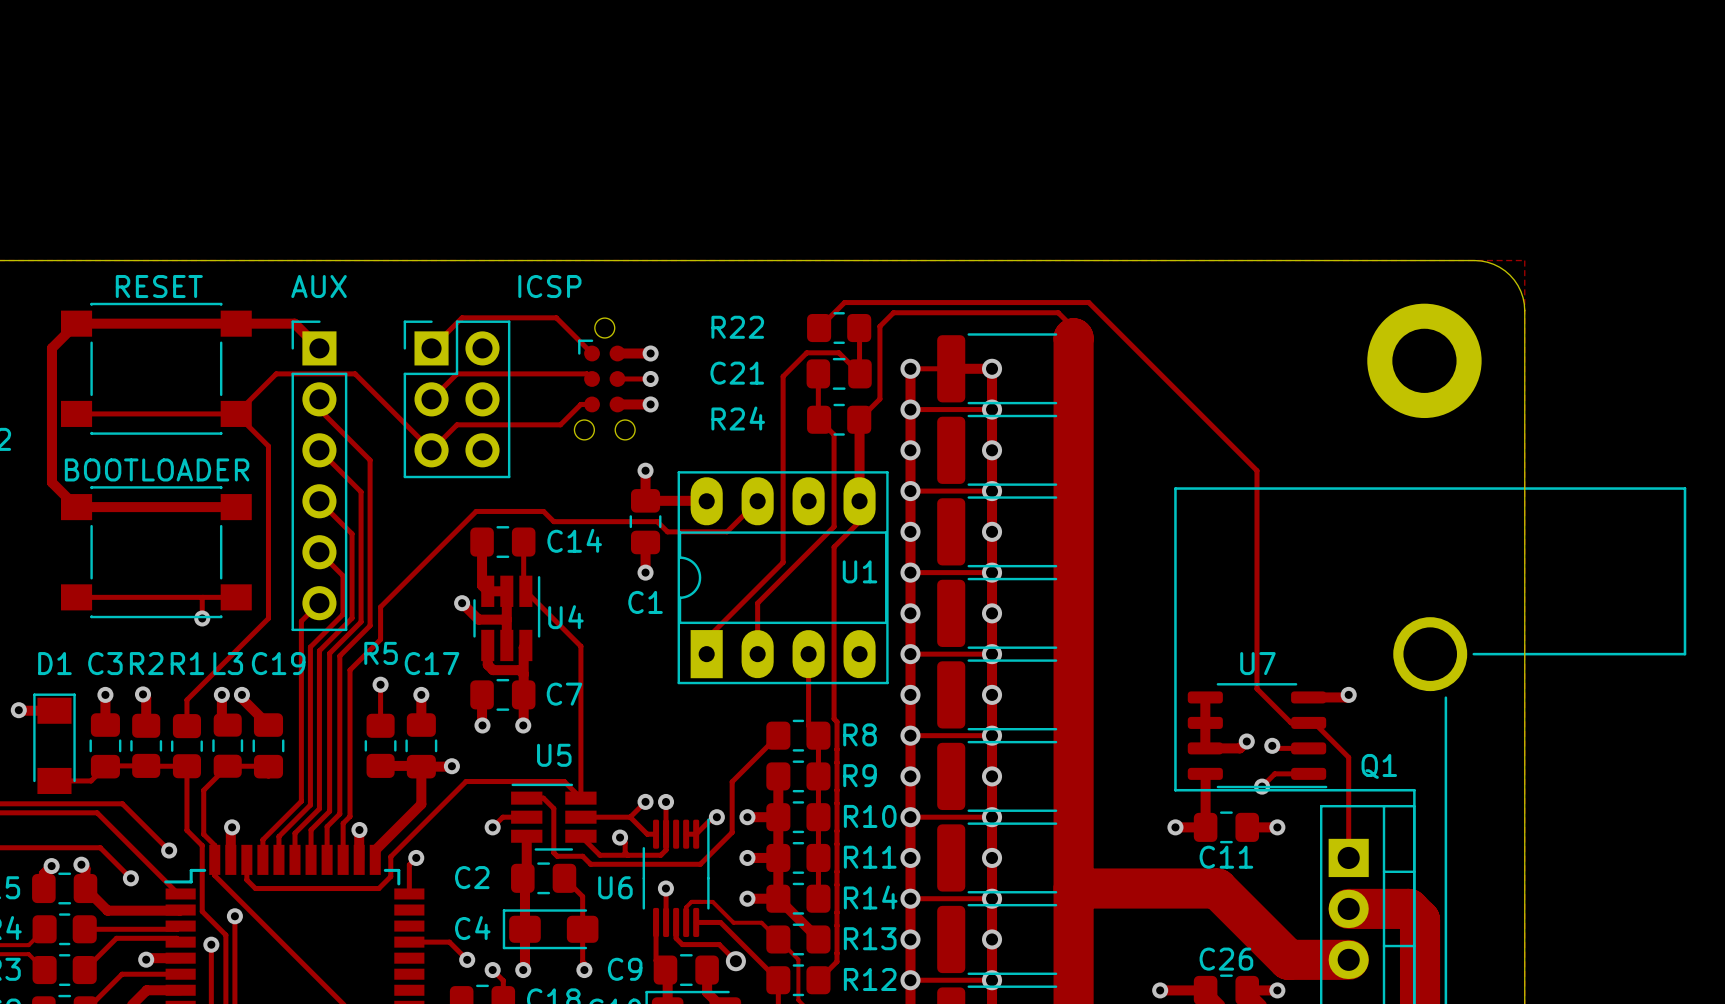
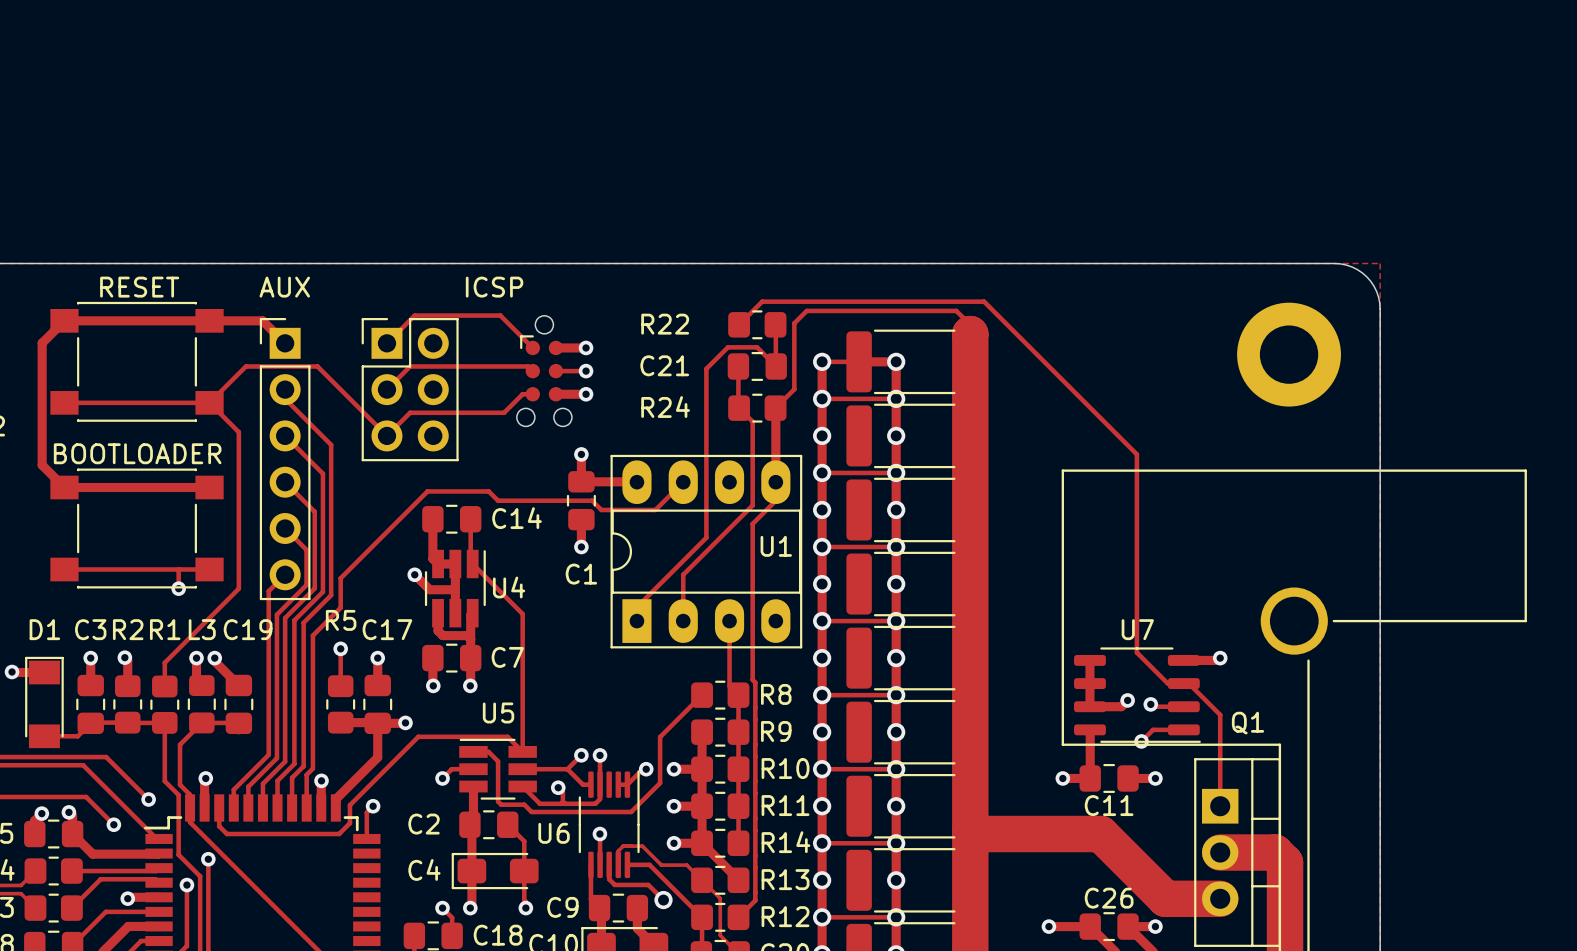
track: (409, 942) (449, 942) (467, 959) -> none
via: (467, 959) -> none

